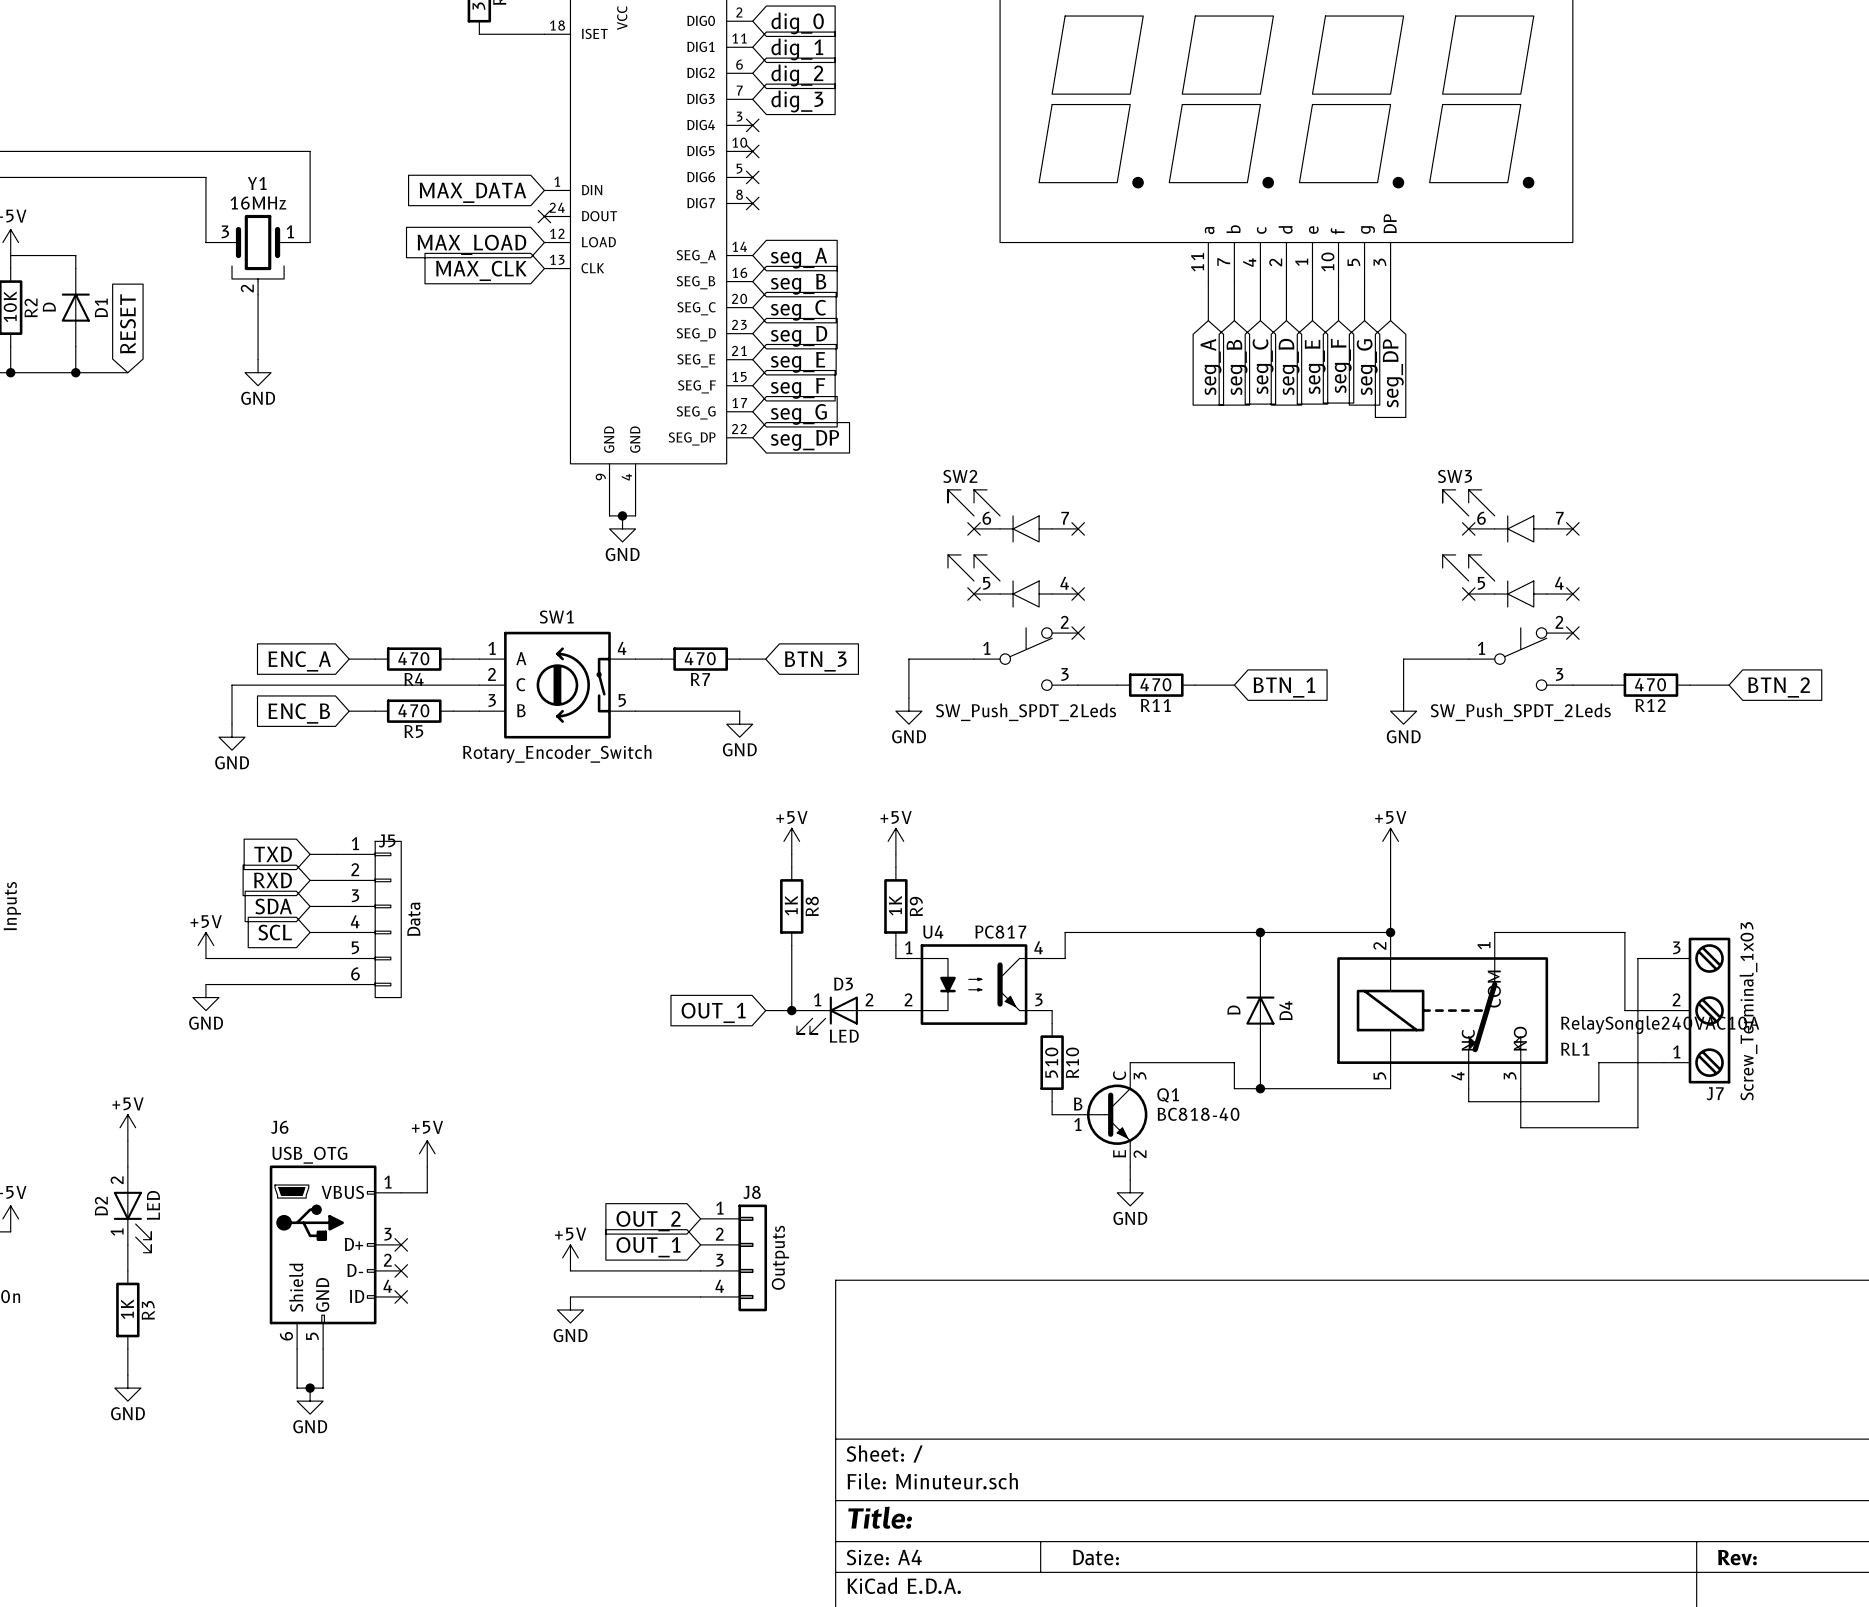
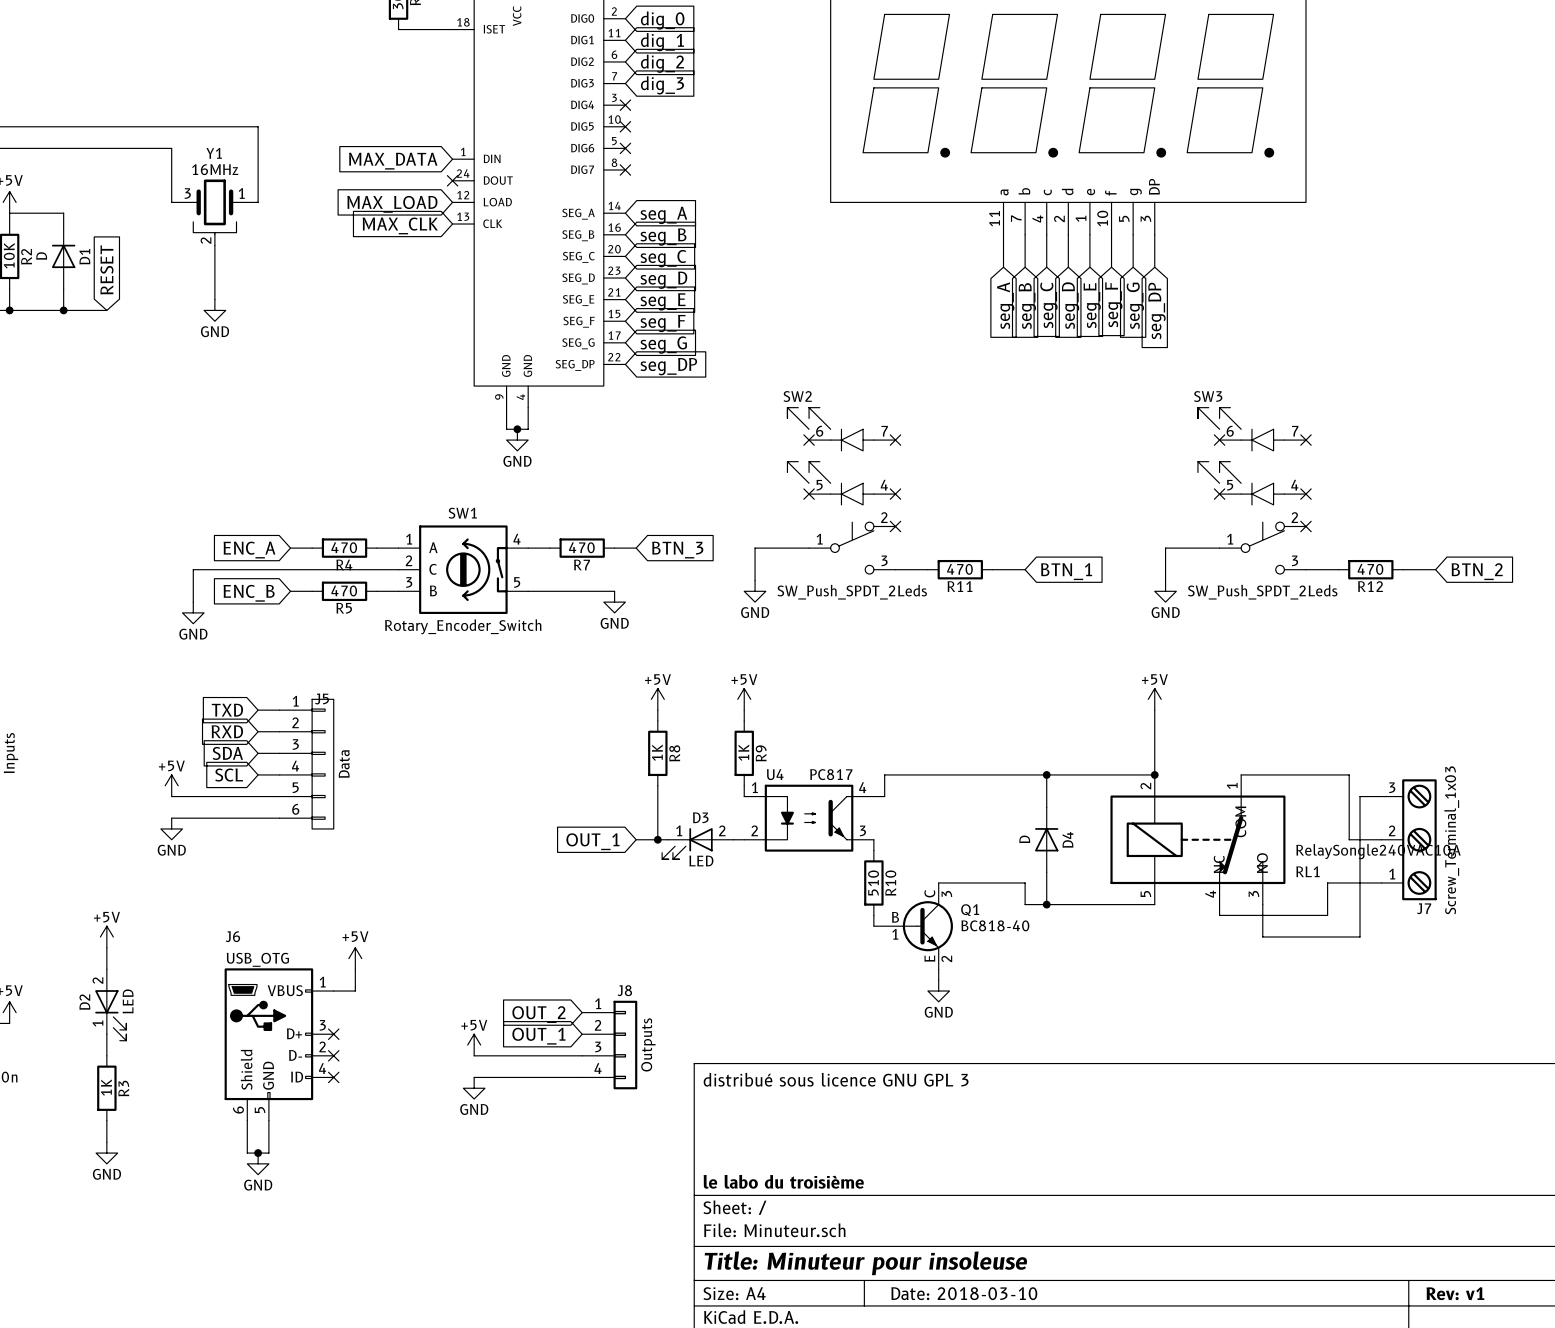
title block: none -> distribué sous licence GNU GPL 3 (836, 1079)
title block: none -> le labo du troisième (783, 1181)
title block: Title: (880, 1517) -> Title: Minuteur pour insoleuse (865, 1263)
title block: Date: (1096, 1557) -> Date: 2018-03-10 (964, 1293)
title block: Rev: (1737, 1557) -> Rev: v1 (1455, 1293)

